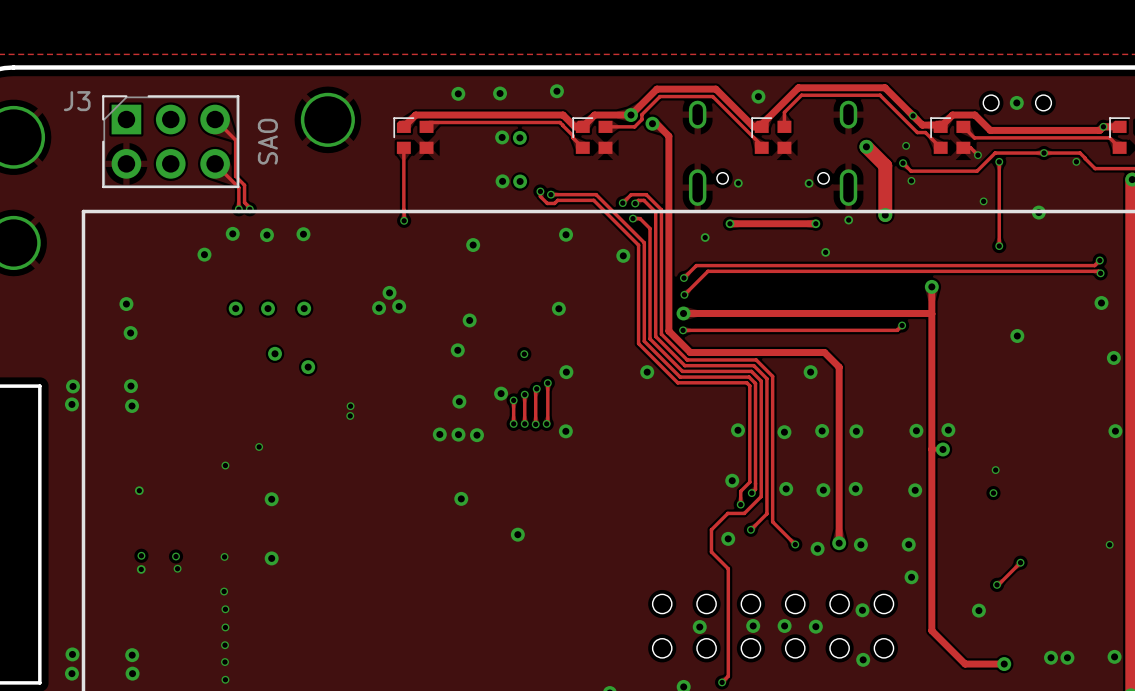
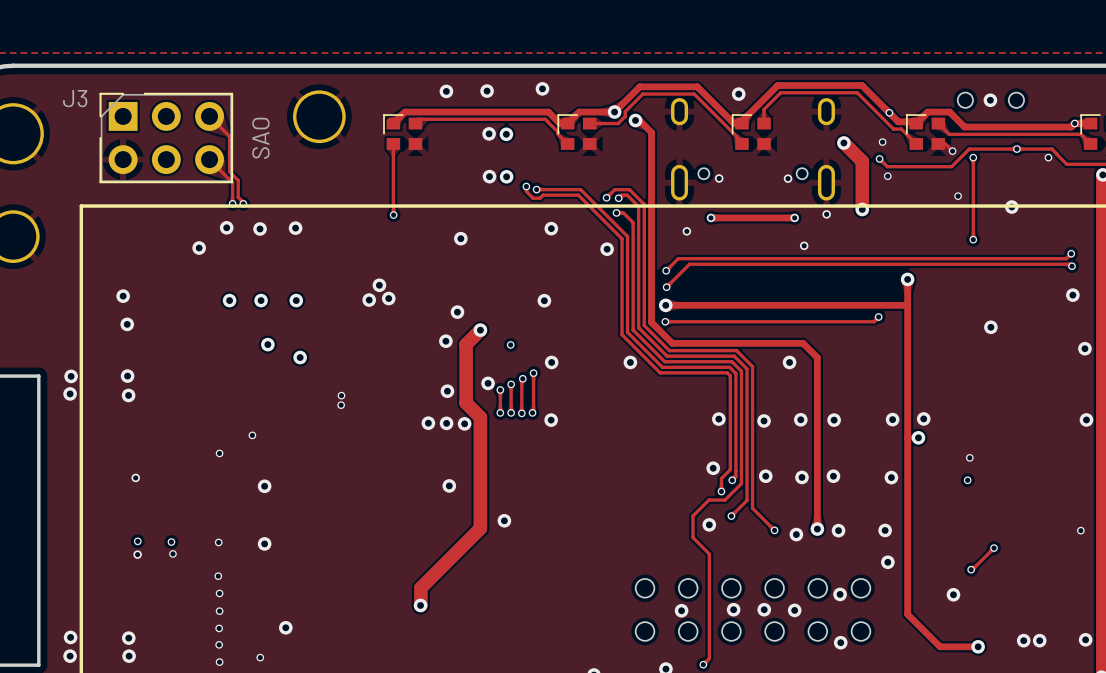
track: none -> (480, 330) (466, 344) (466, 403) (480, 417) (480, 528) (420, 587) (420, 605)
via: none -> (480, 330)
via: none -> (420, 605)
via: none -> (285, 627)
via: none -> (260, 657)

